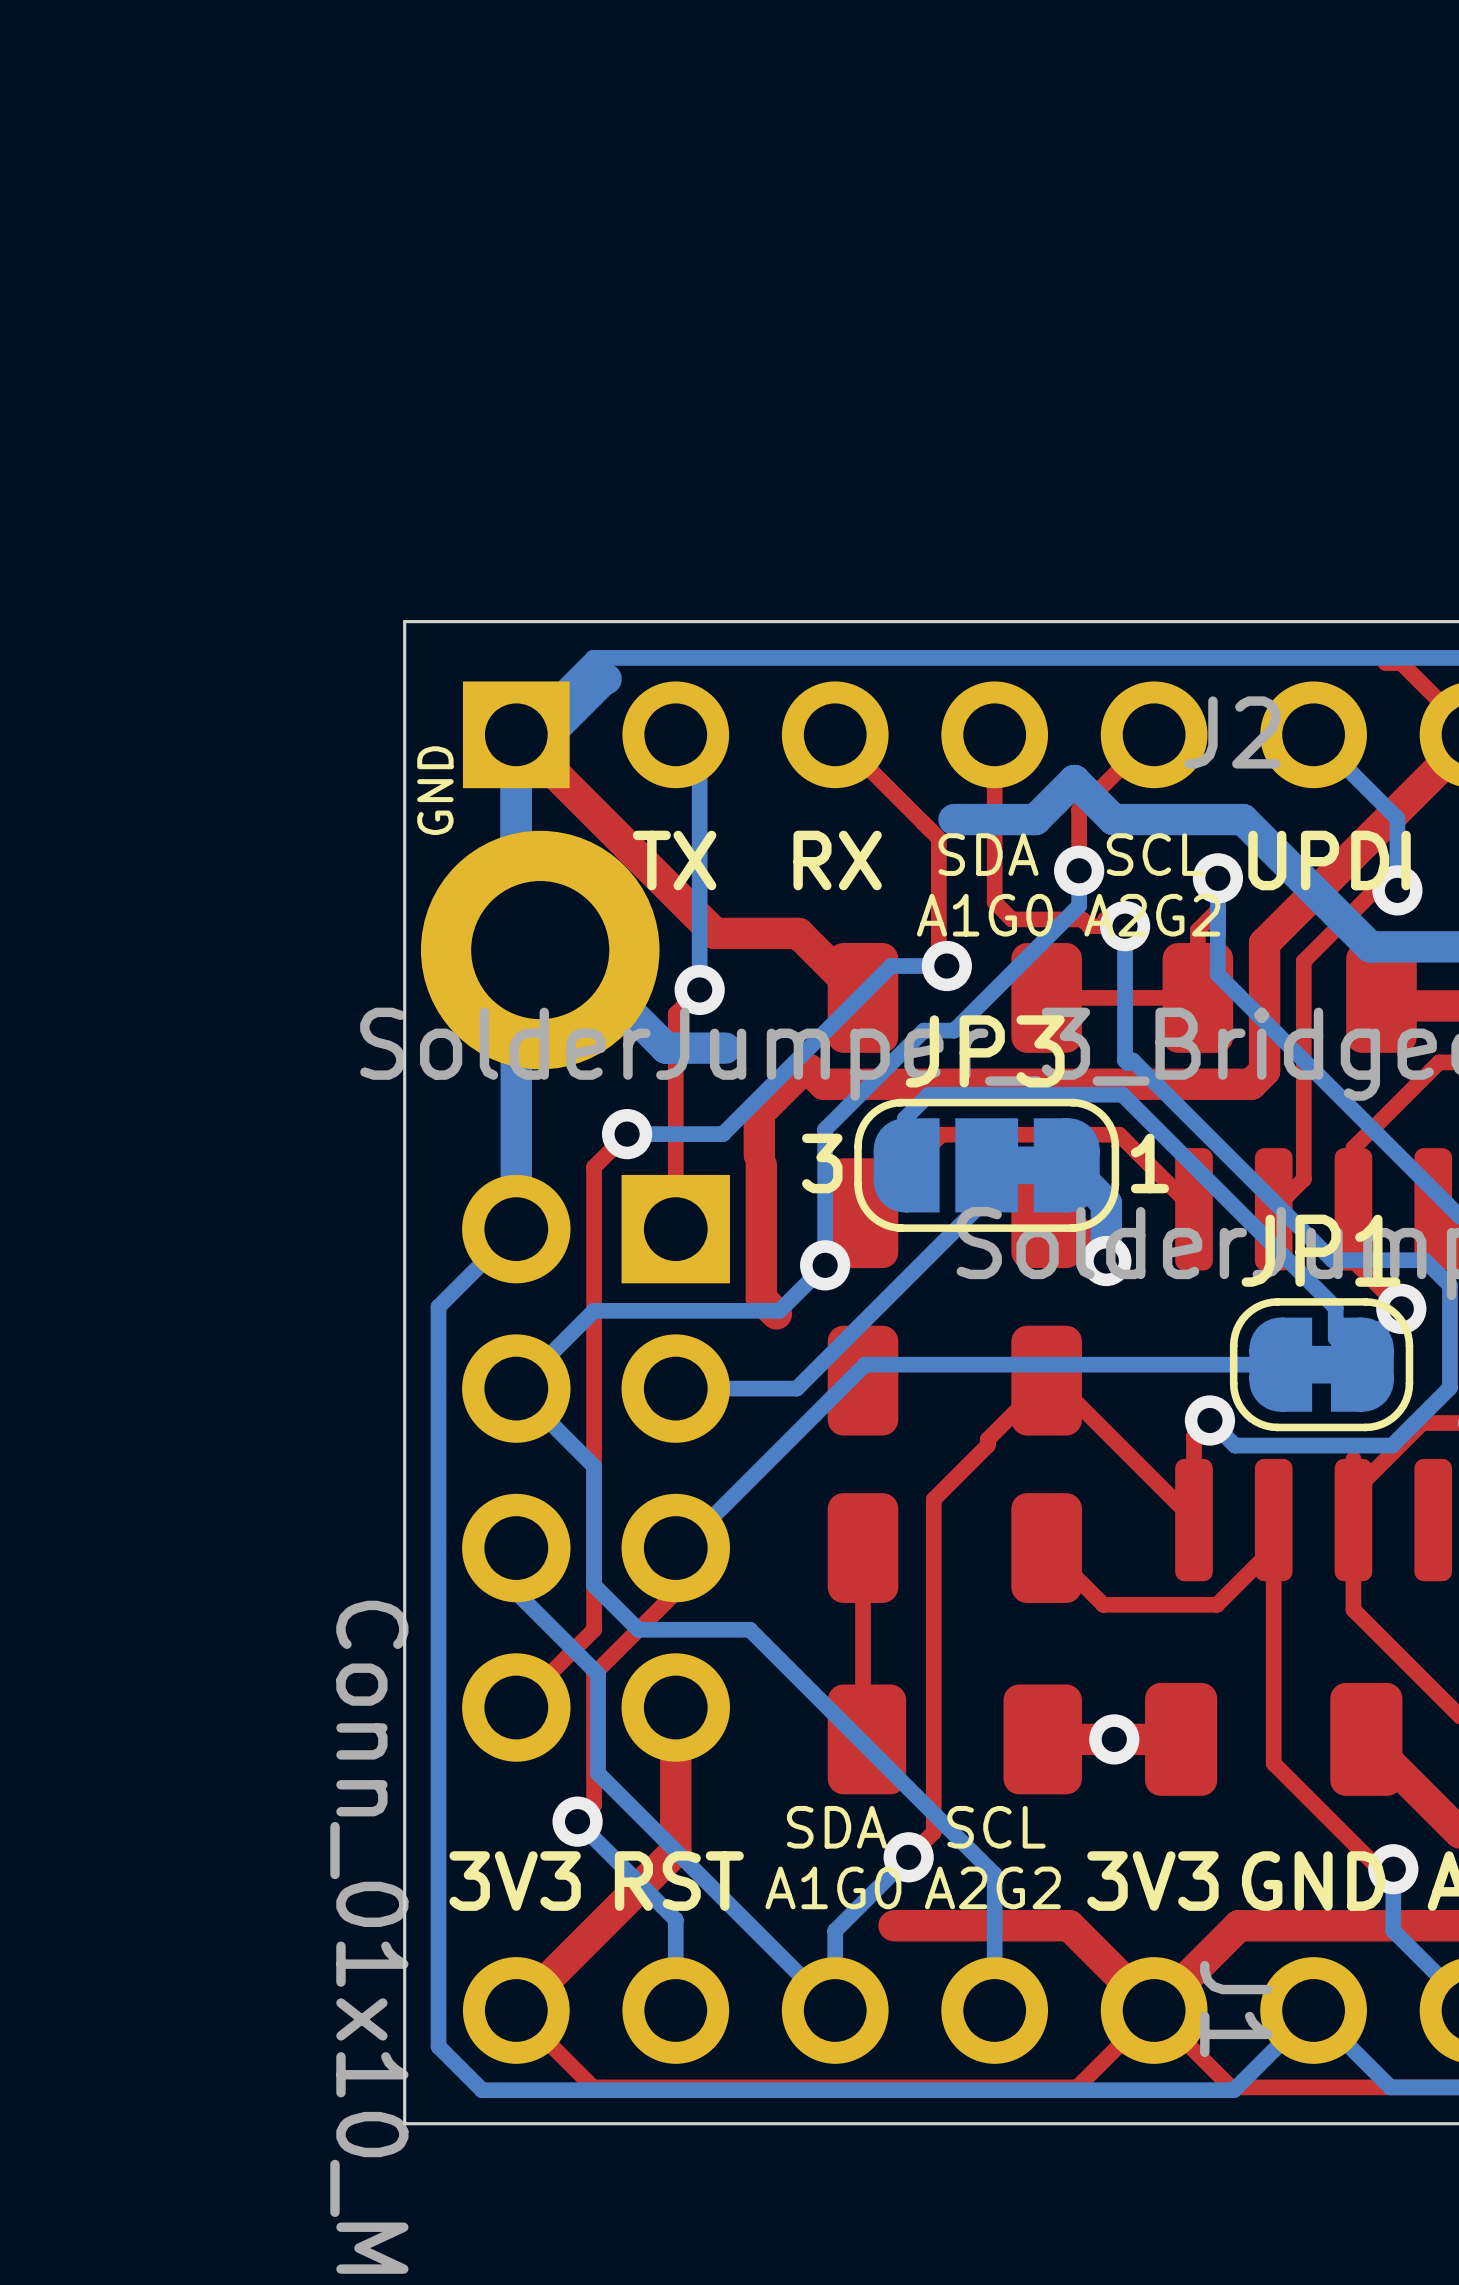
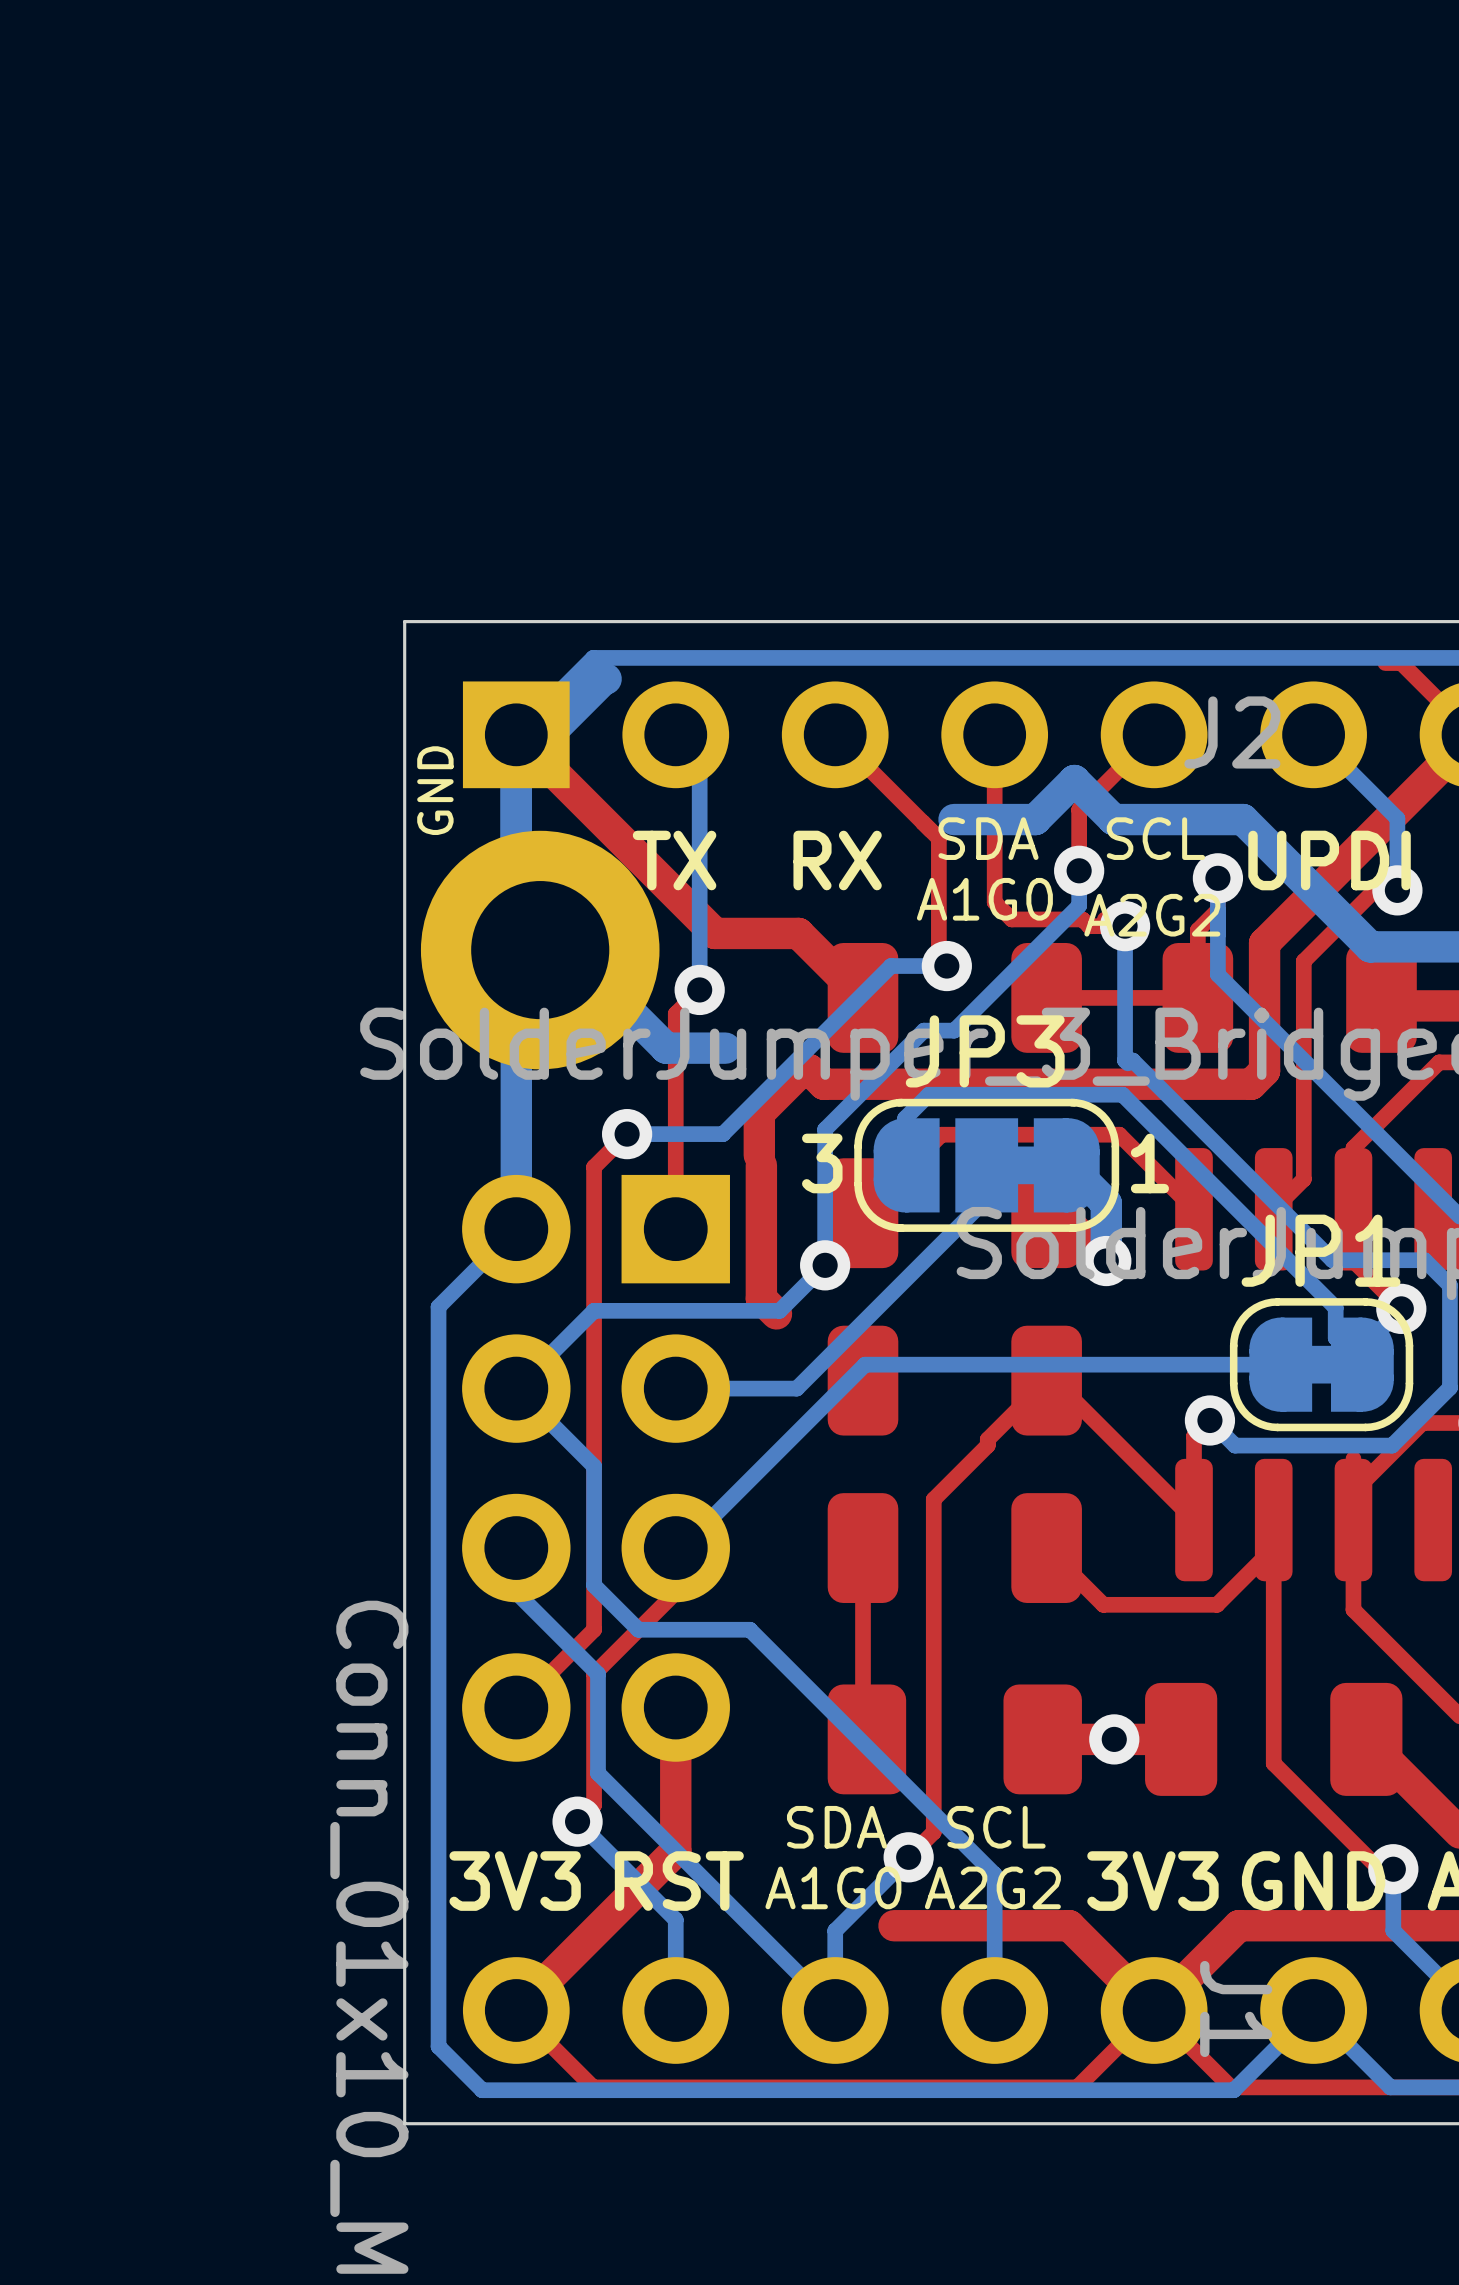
text position: SDA (988, 854) -> SDA (988, 838)
text position: SCL (1155, 854) -> SCL (1155, 838)
text position: A1G0 (984, 915) -> A1G0 (984, 899)

